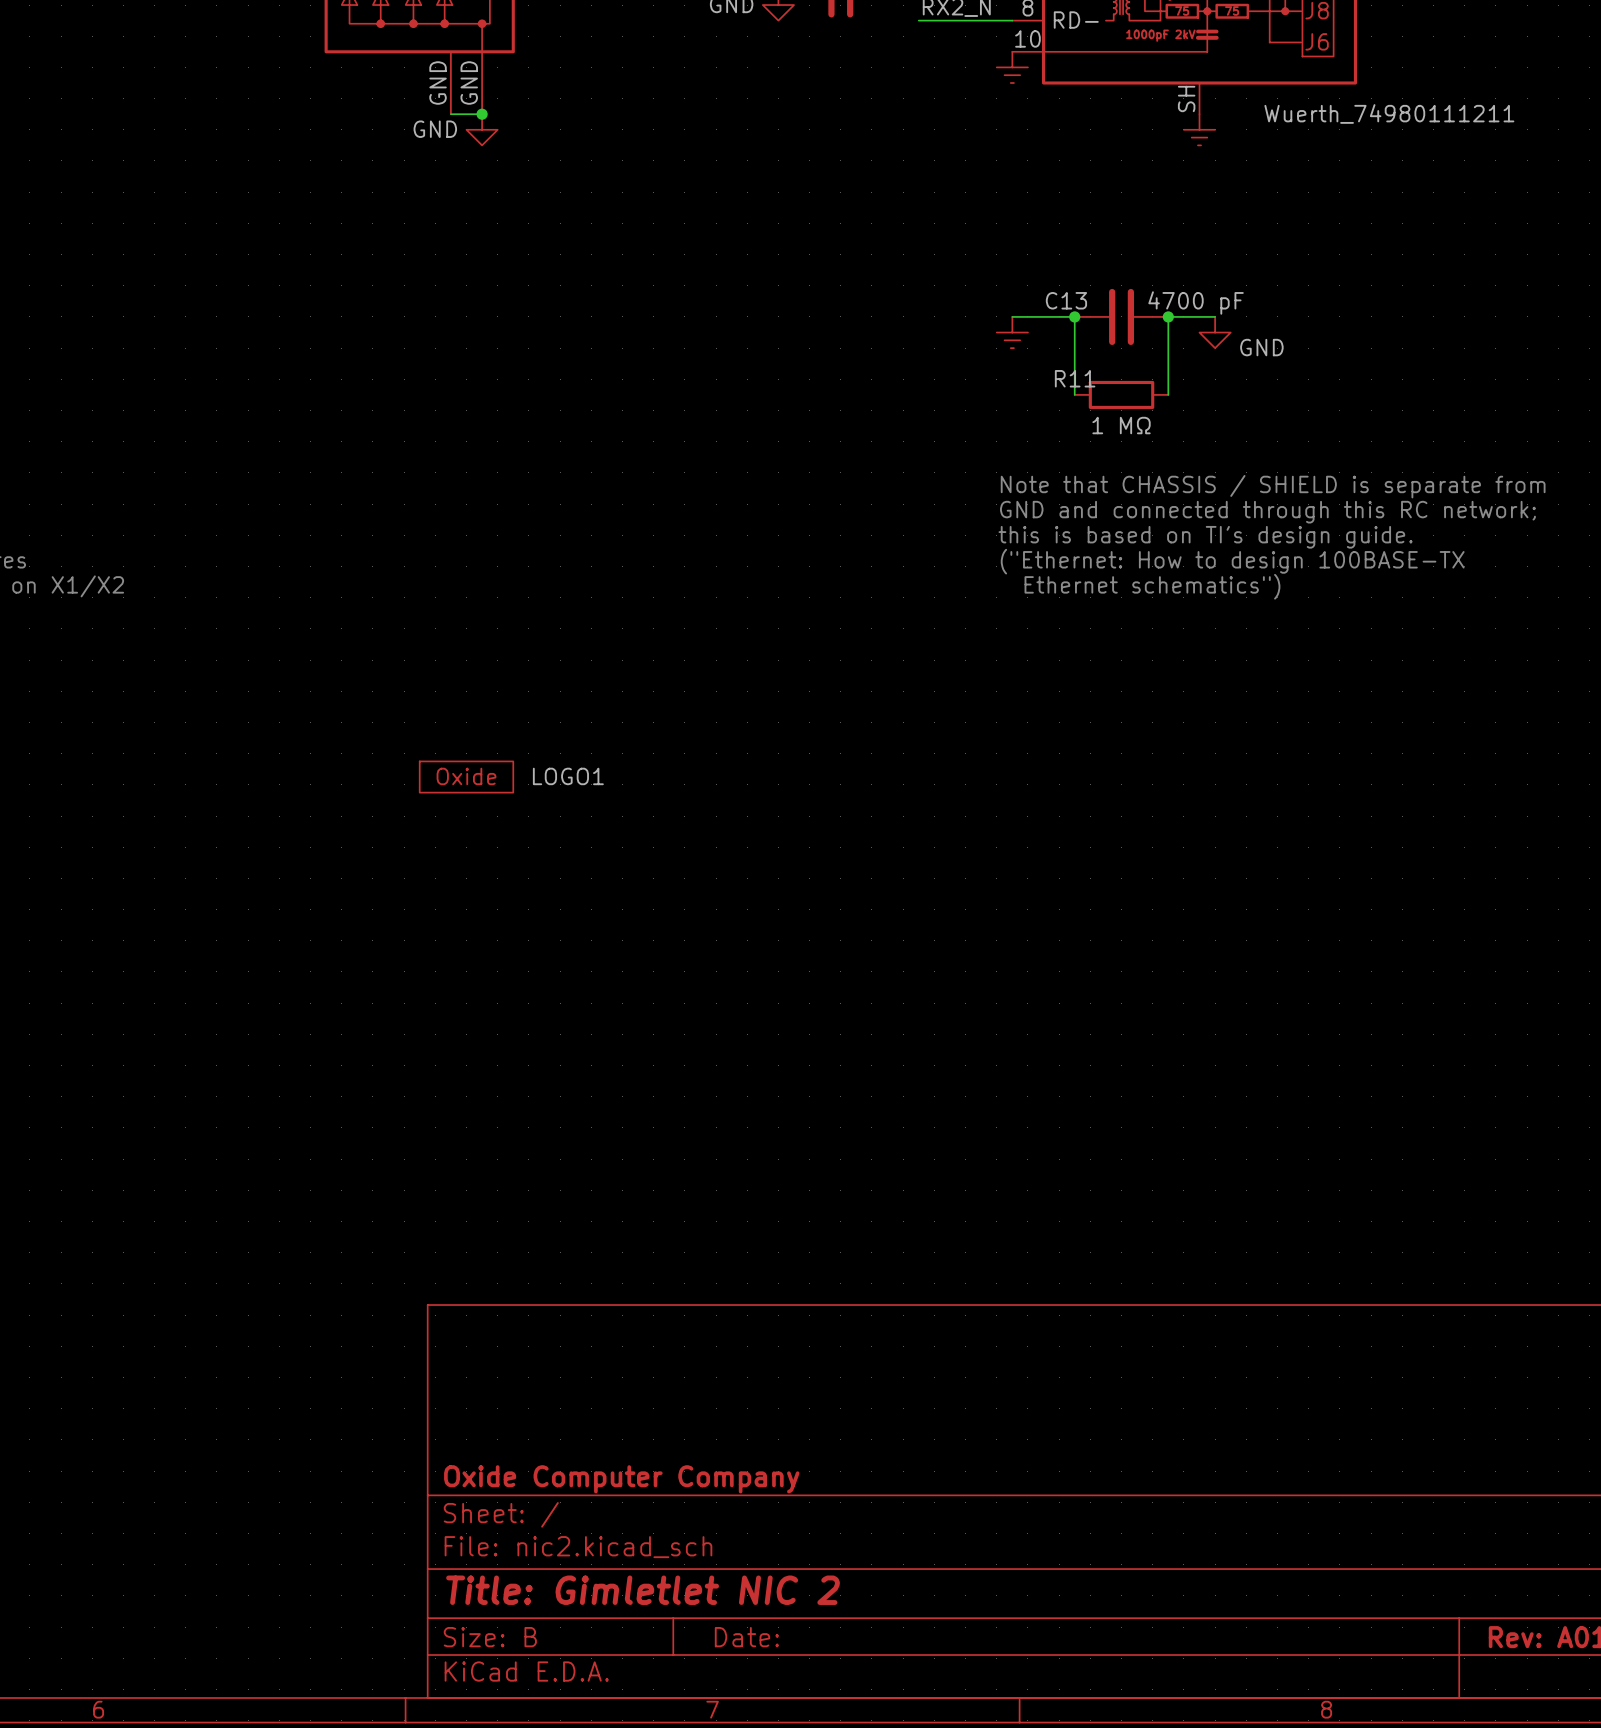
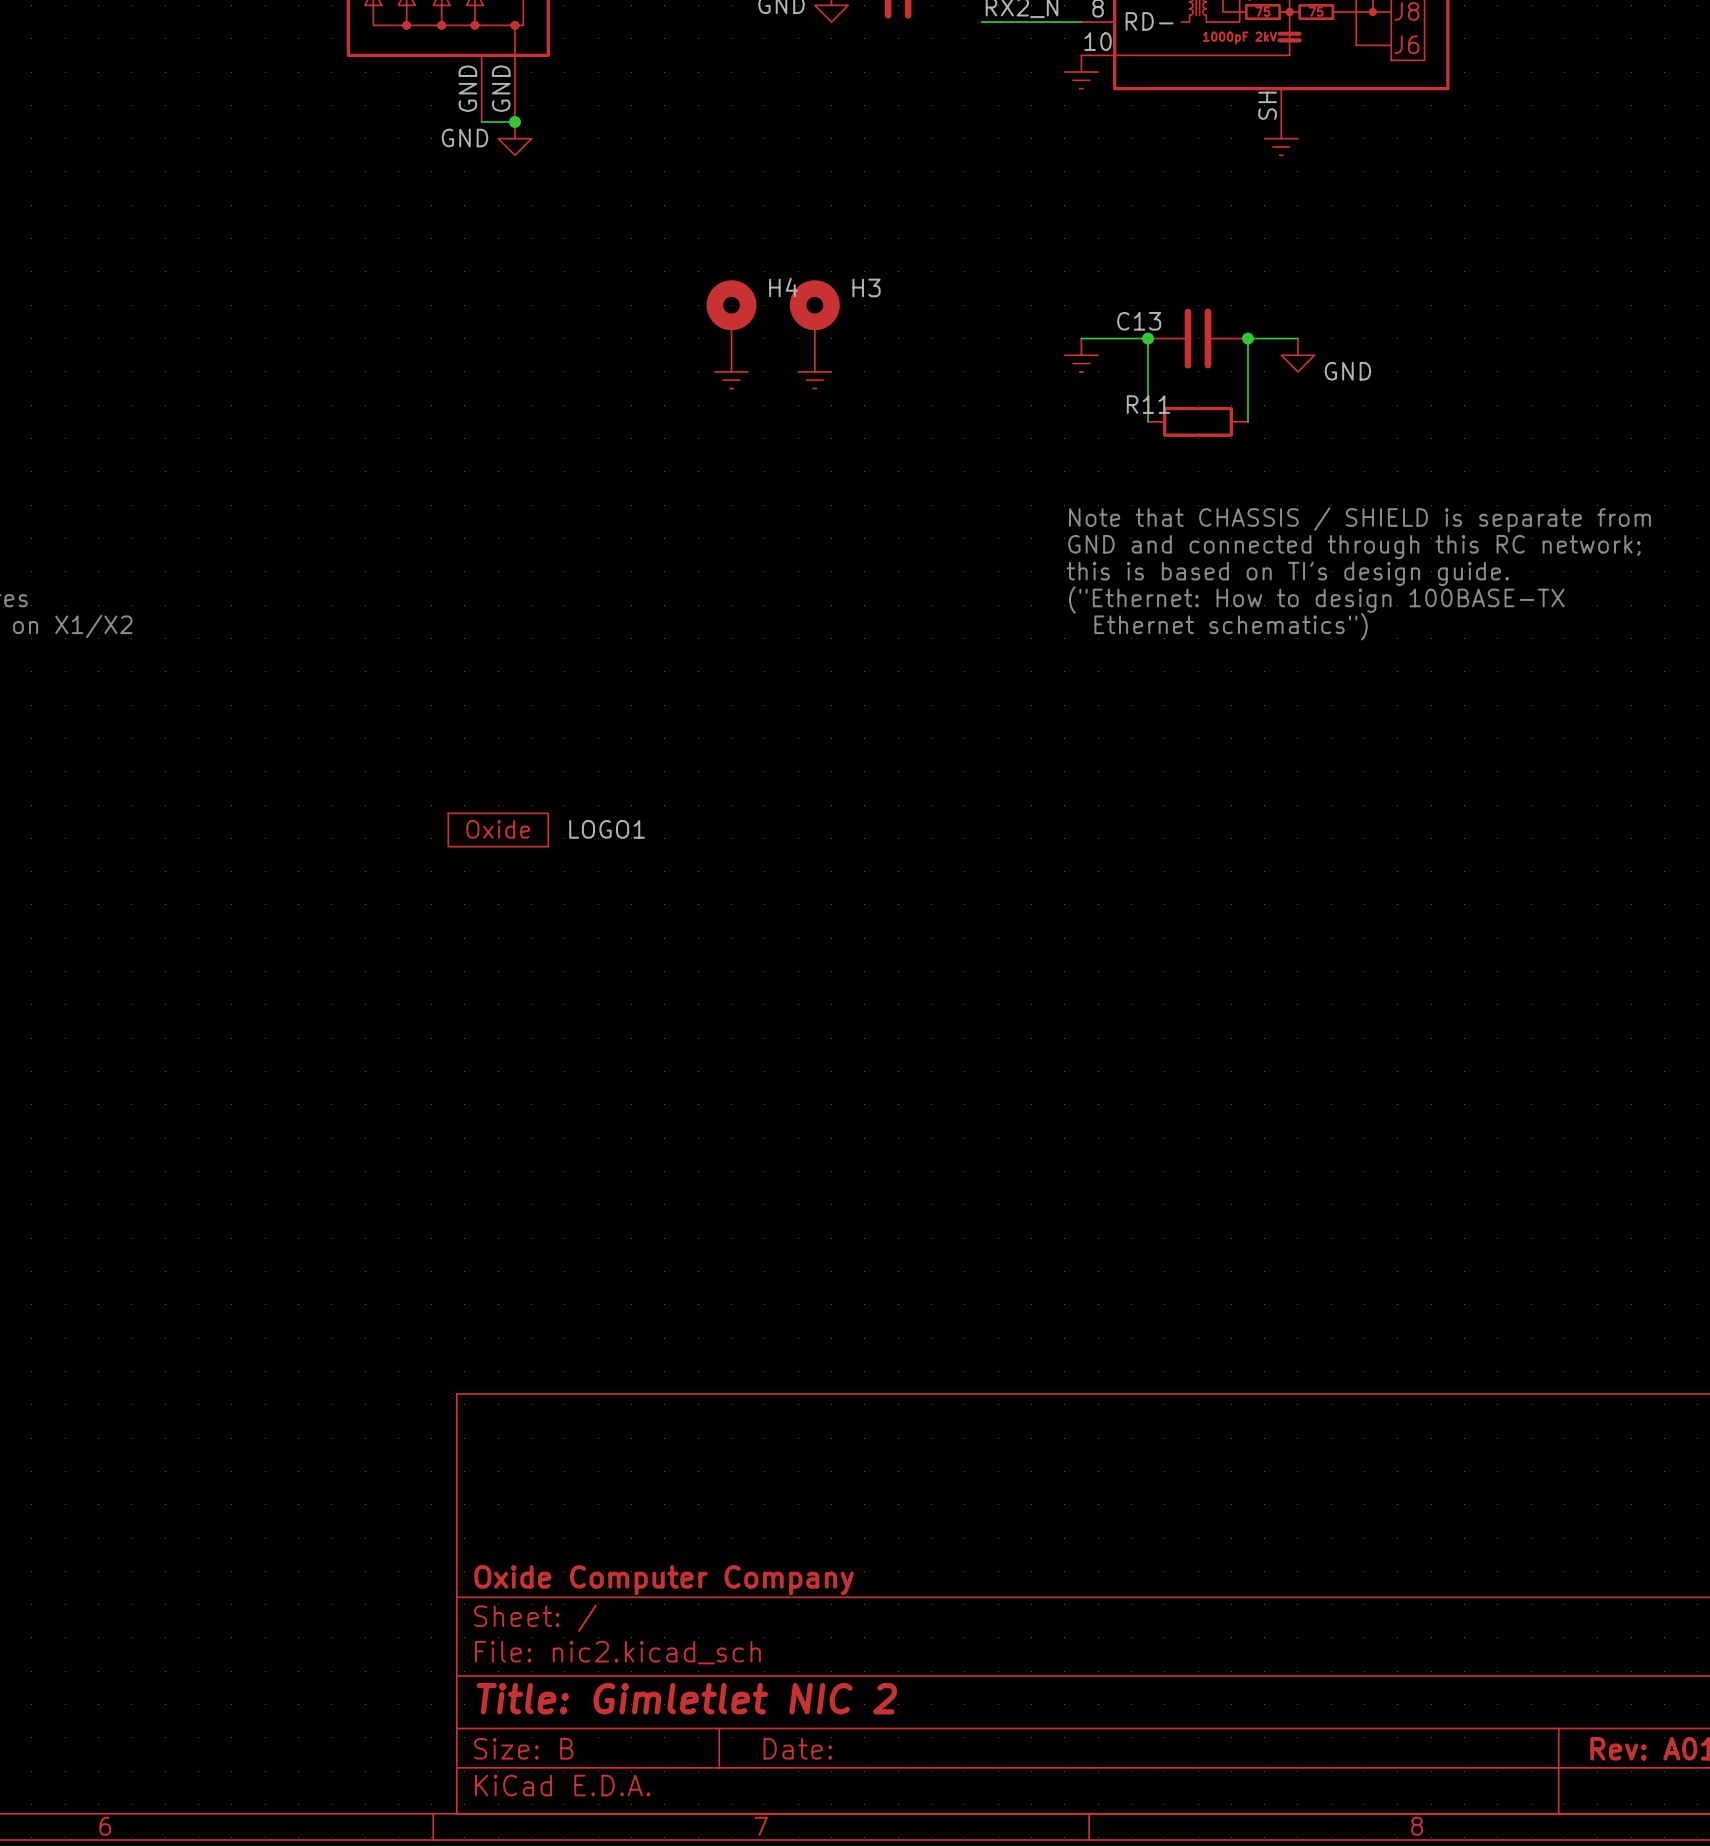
part value: Wuerth_74980111211 (1389, 113) -> none
H4: none -> (731, 317)
H3: none -> (814, 317)
C13 value: 4700 pF (1196, 302) -> none
power symbol: none -> (731, 371)
power symbol: none -> (814, 371)
R11 value: 1 MΩ (1121, 425) -> none

